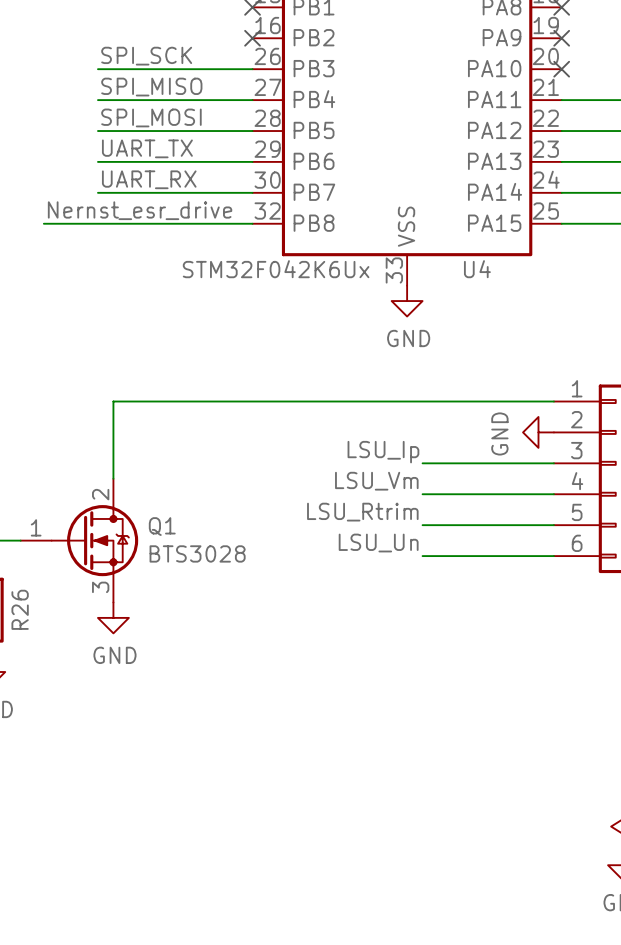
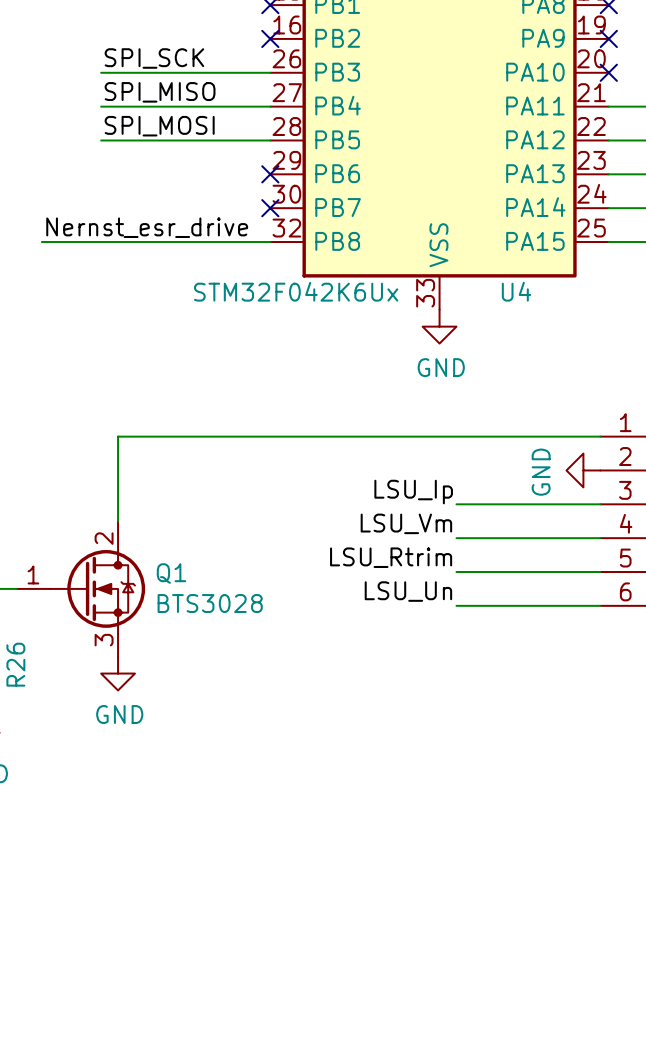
label: UART_TX (147, 148) -> none
wire: (97, 161) (252, 161) -> none
no-connect mark: none -> (270, 174)
label: UART_RX (149, 179) -> none
wire: (97, 192) (252, 192) -> none
no-connect mark: none -> (270, 208)

